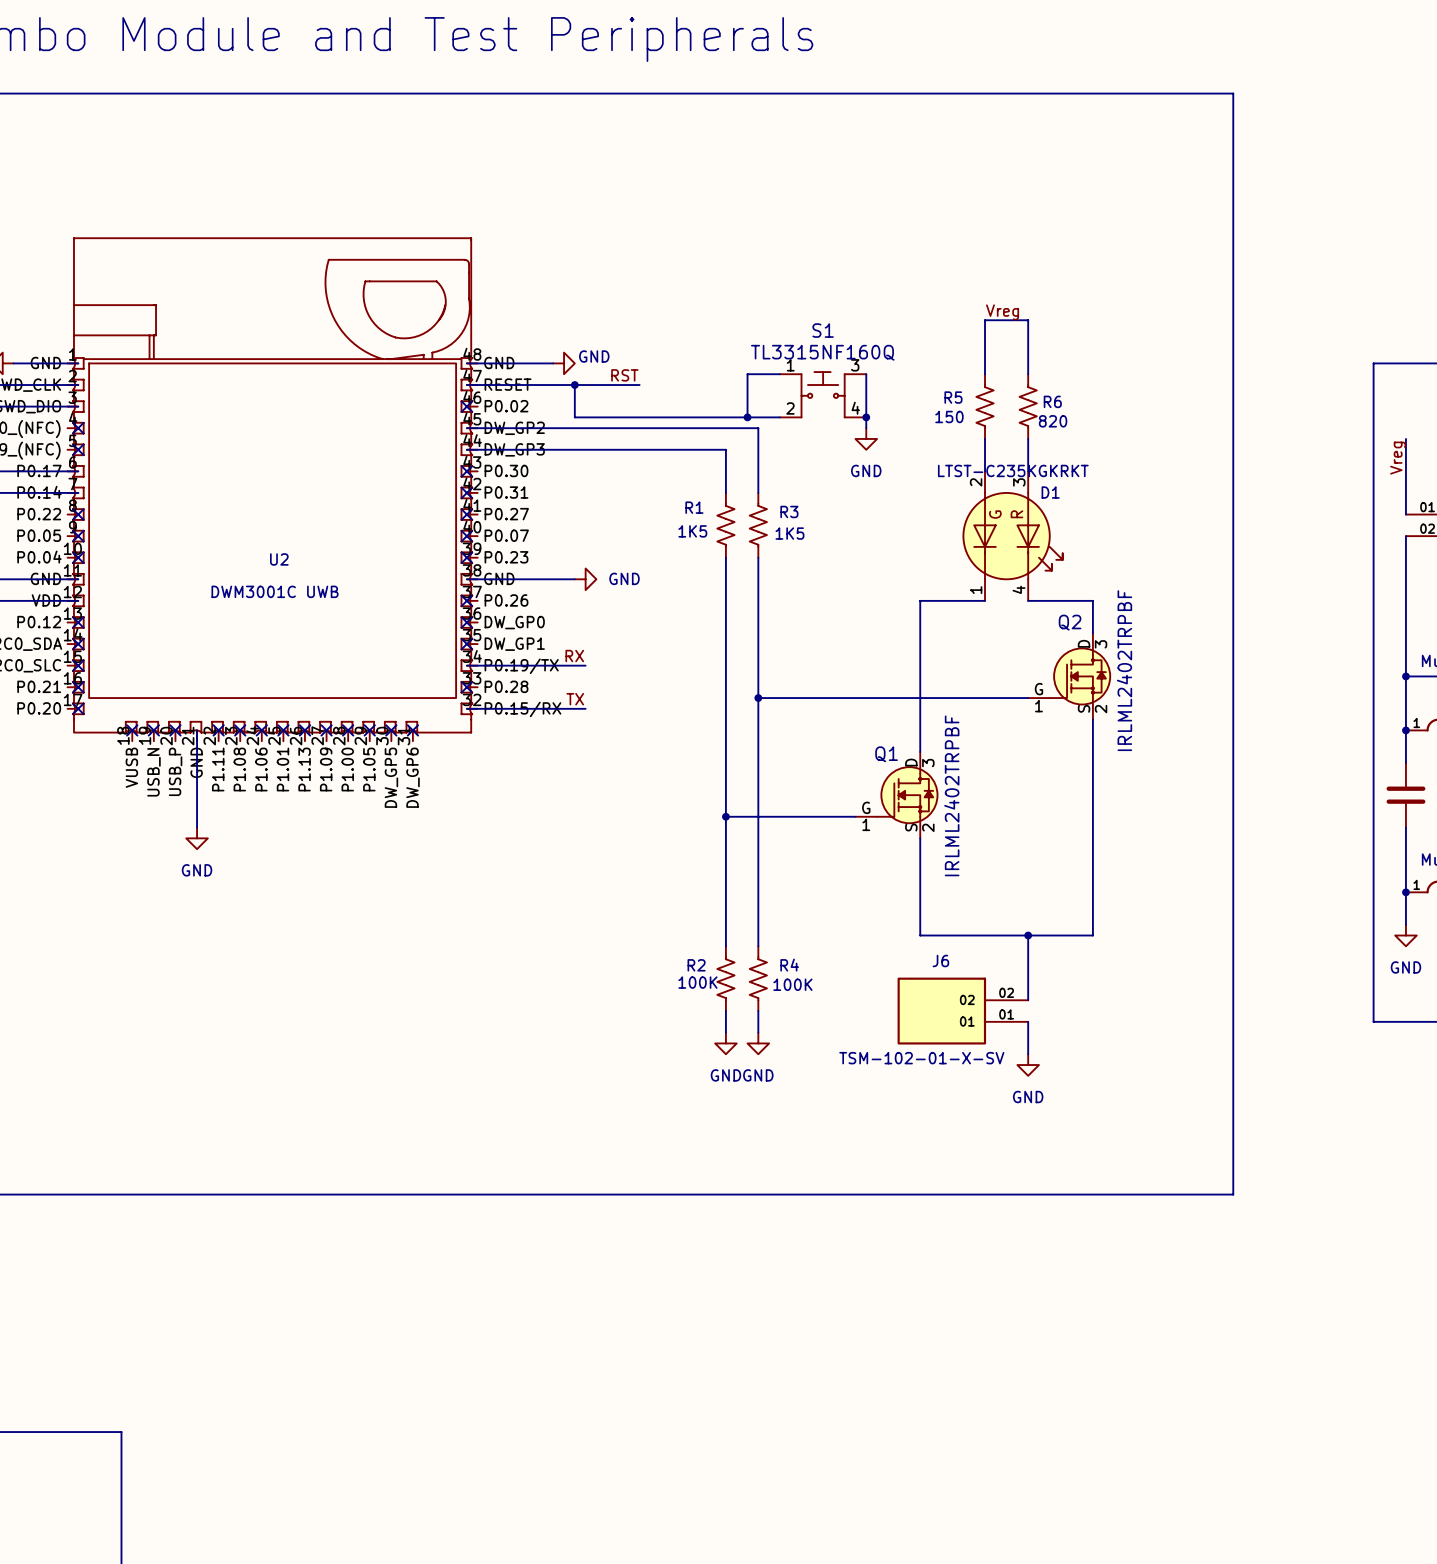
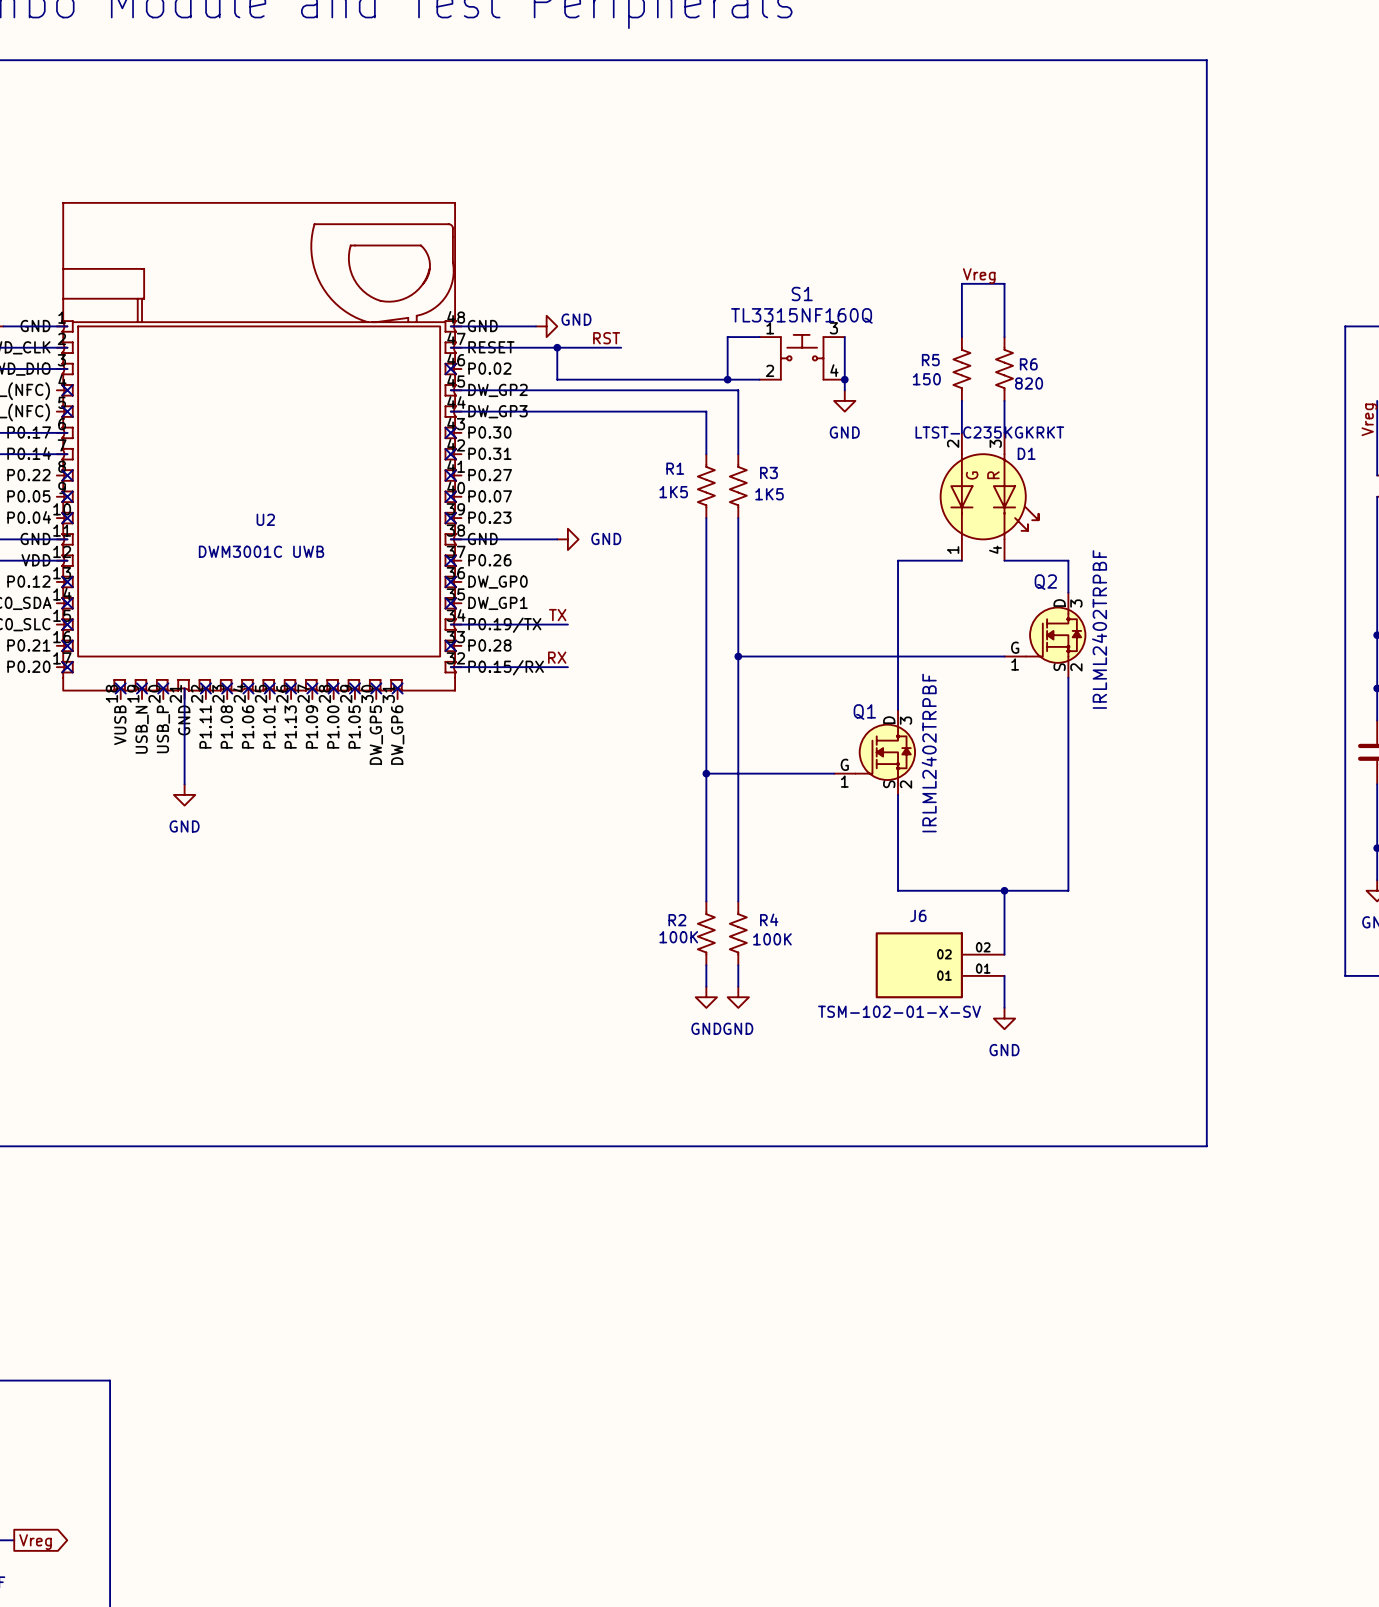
label: RX (574, 656) -> TX (557, 615)
label: TX (575, 699) -> RX (557, 657)

